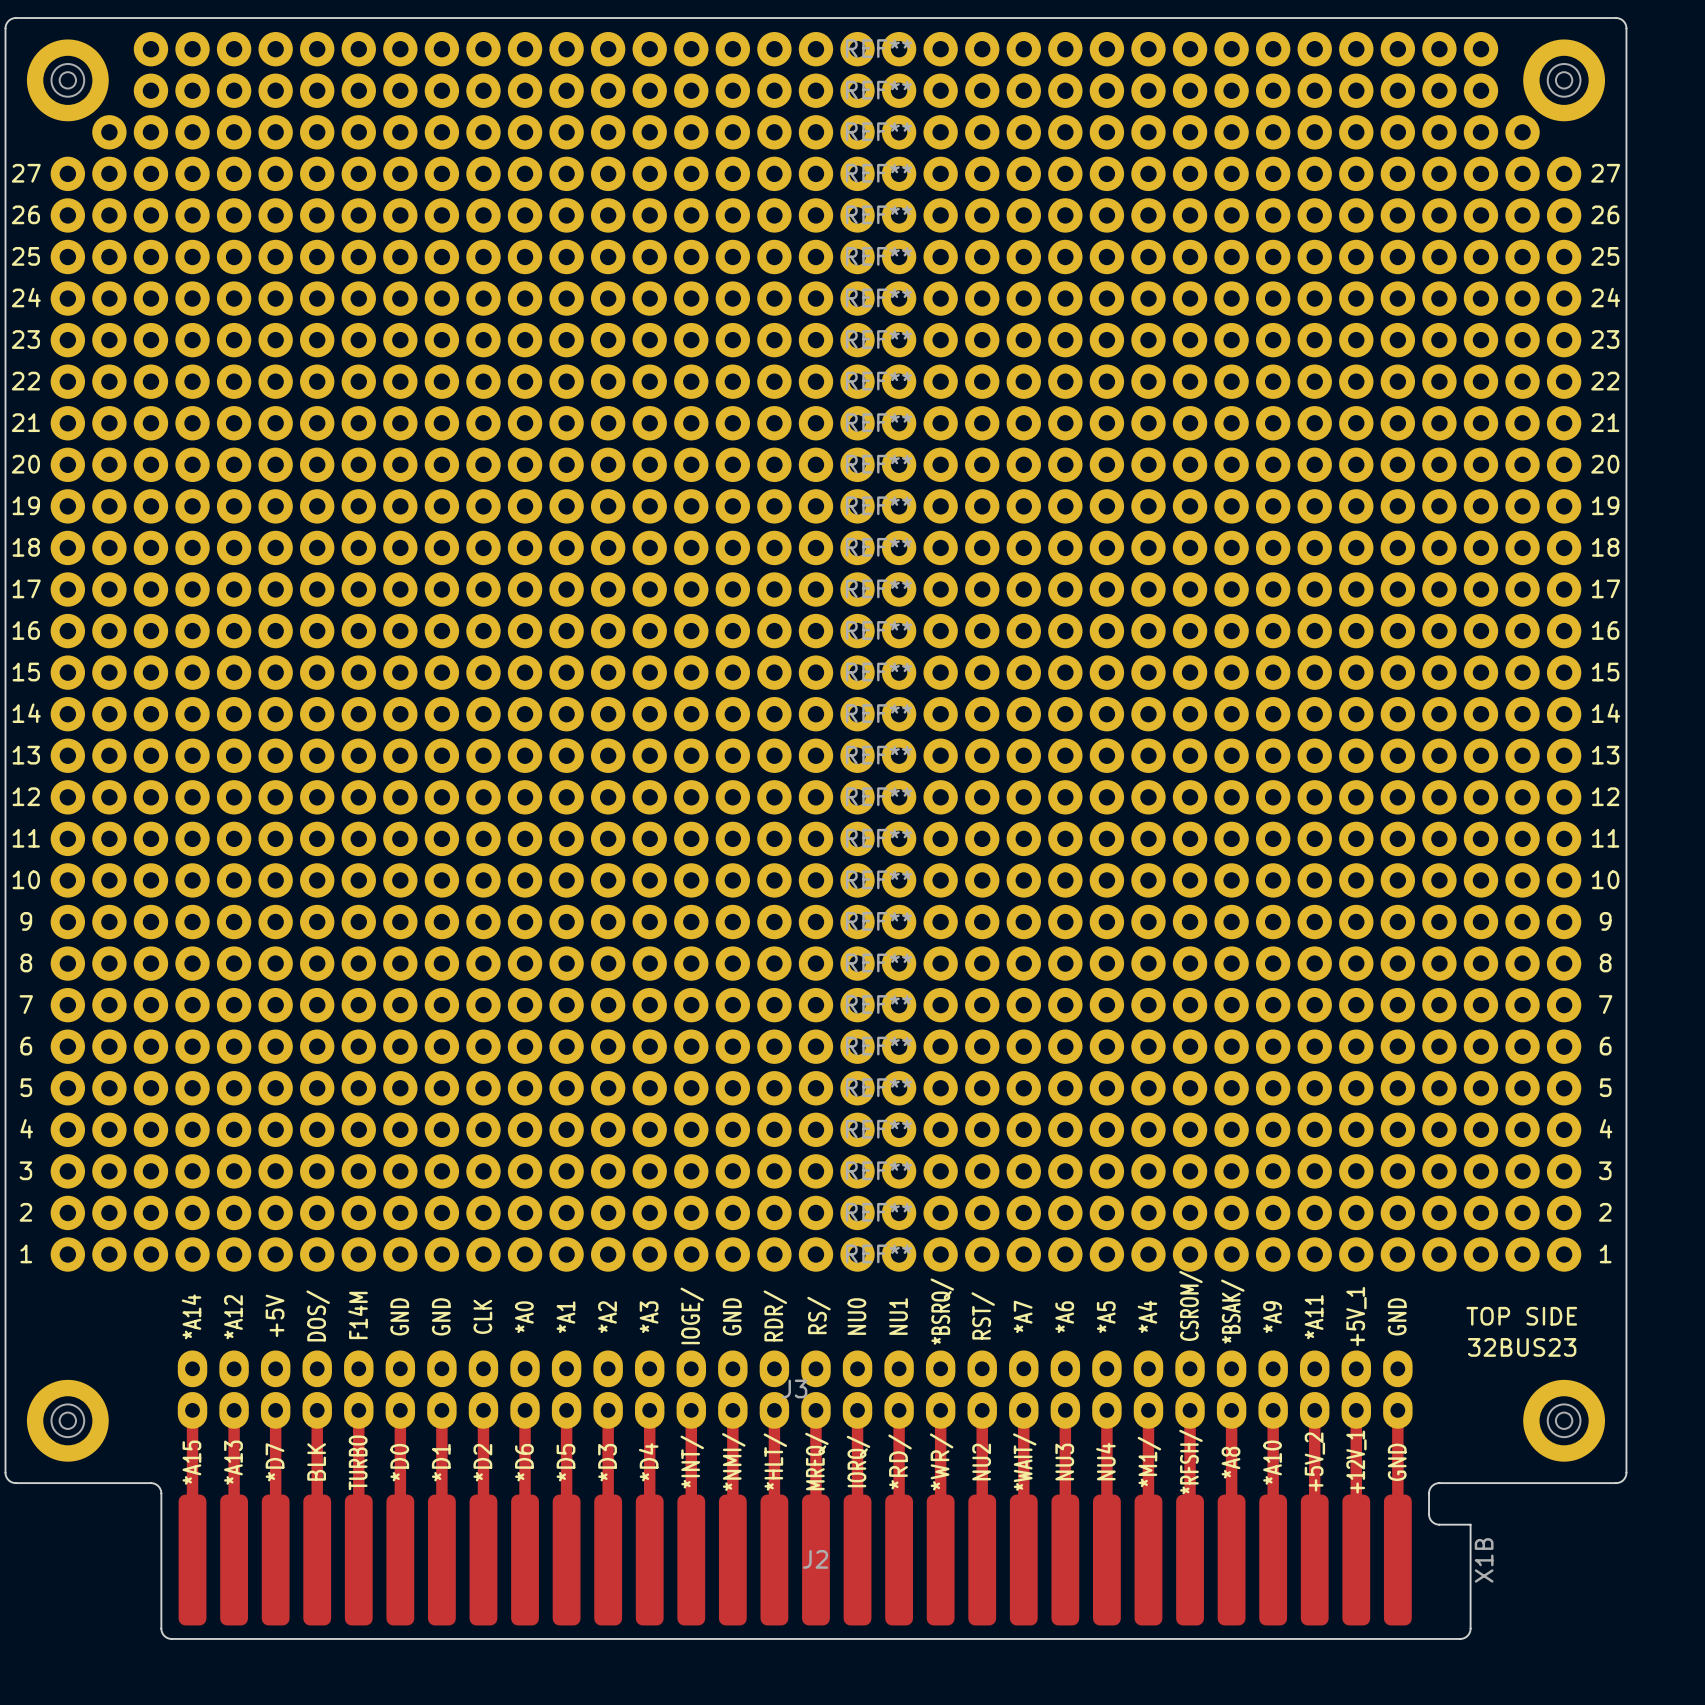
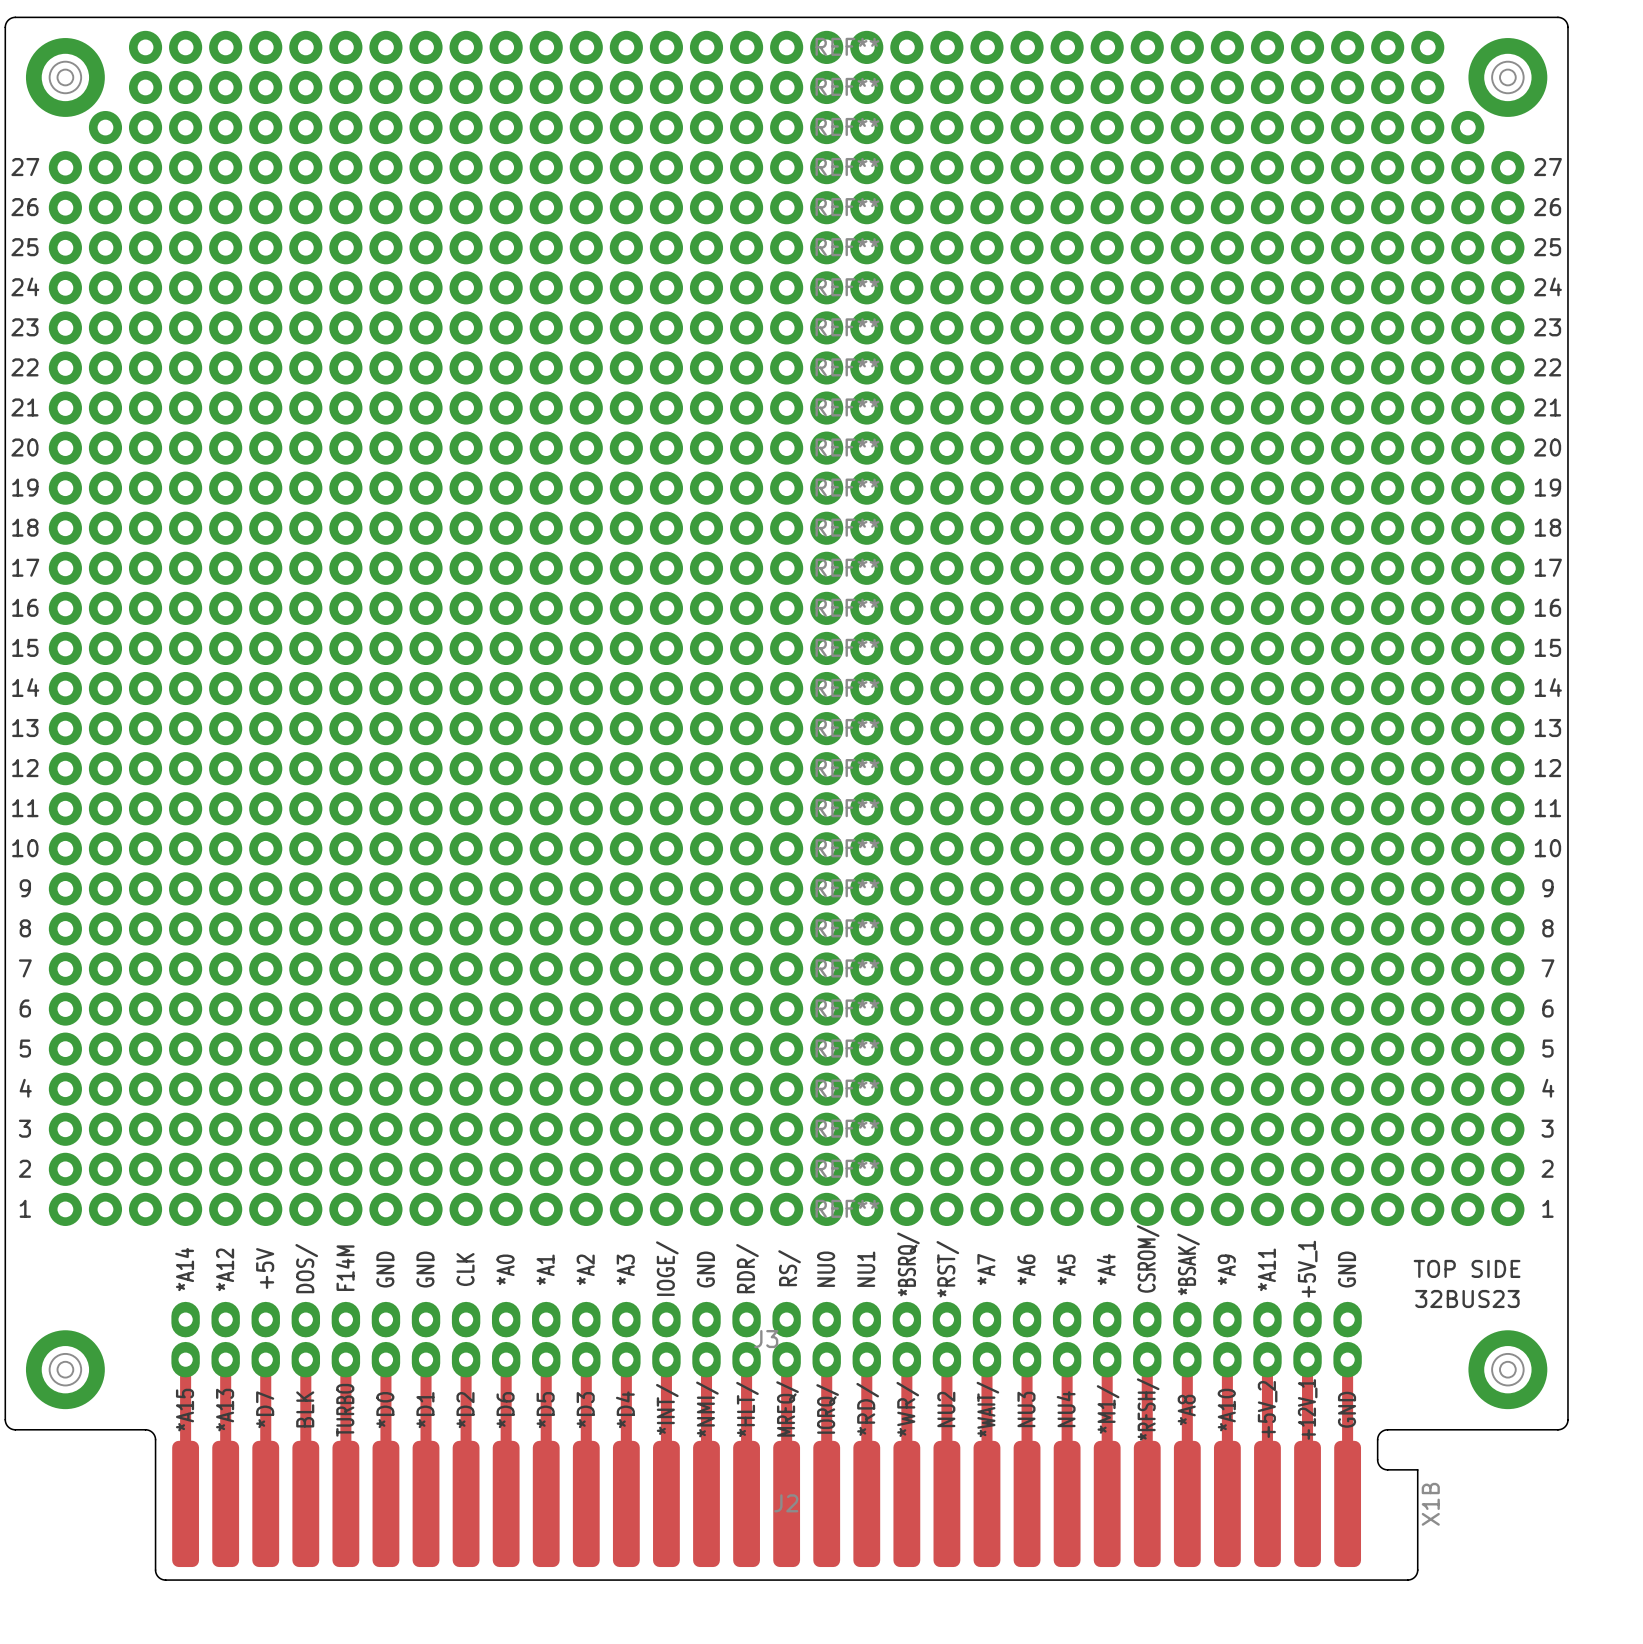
text: RST/ (983, 1315) -> *RST/ (947, 1269)

